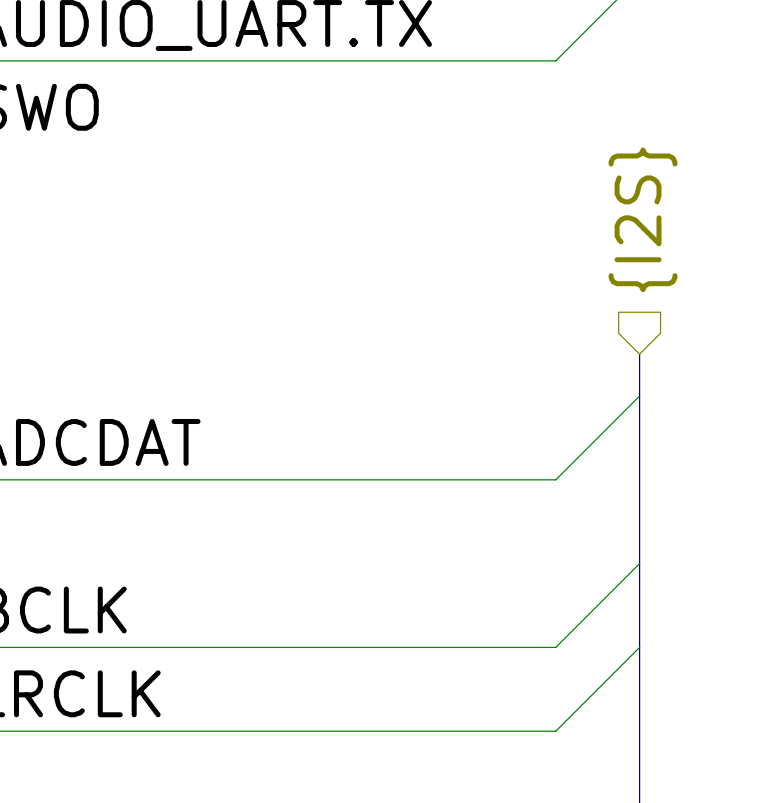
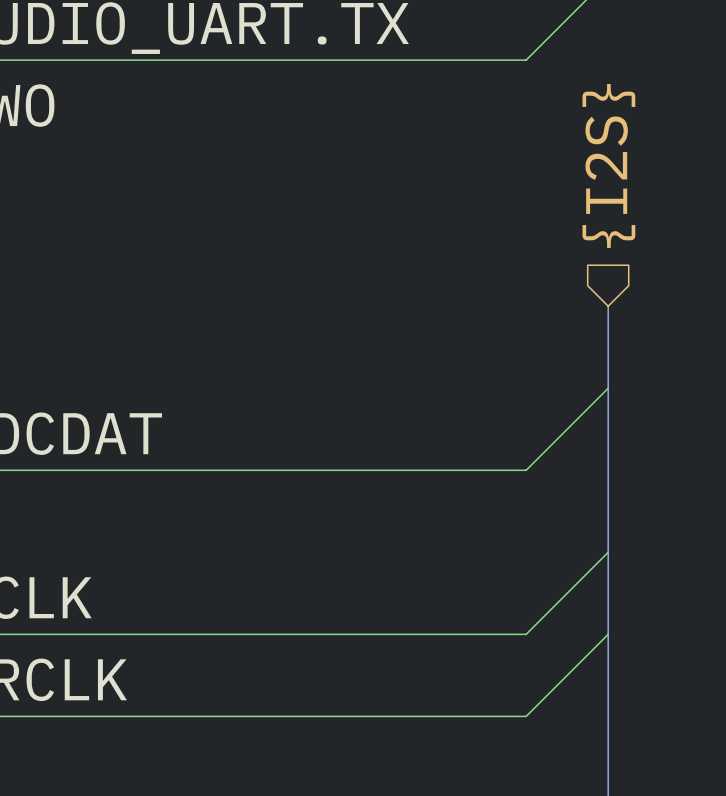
hierarchical label position: {I2S} (643, 219) -> {I2S} (608, 165)
bus: none -> (608, 306) (608, 347)

